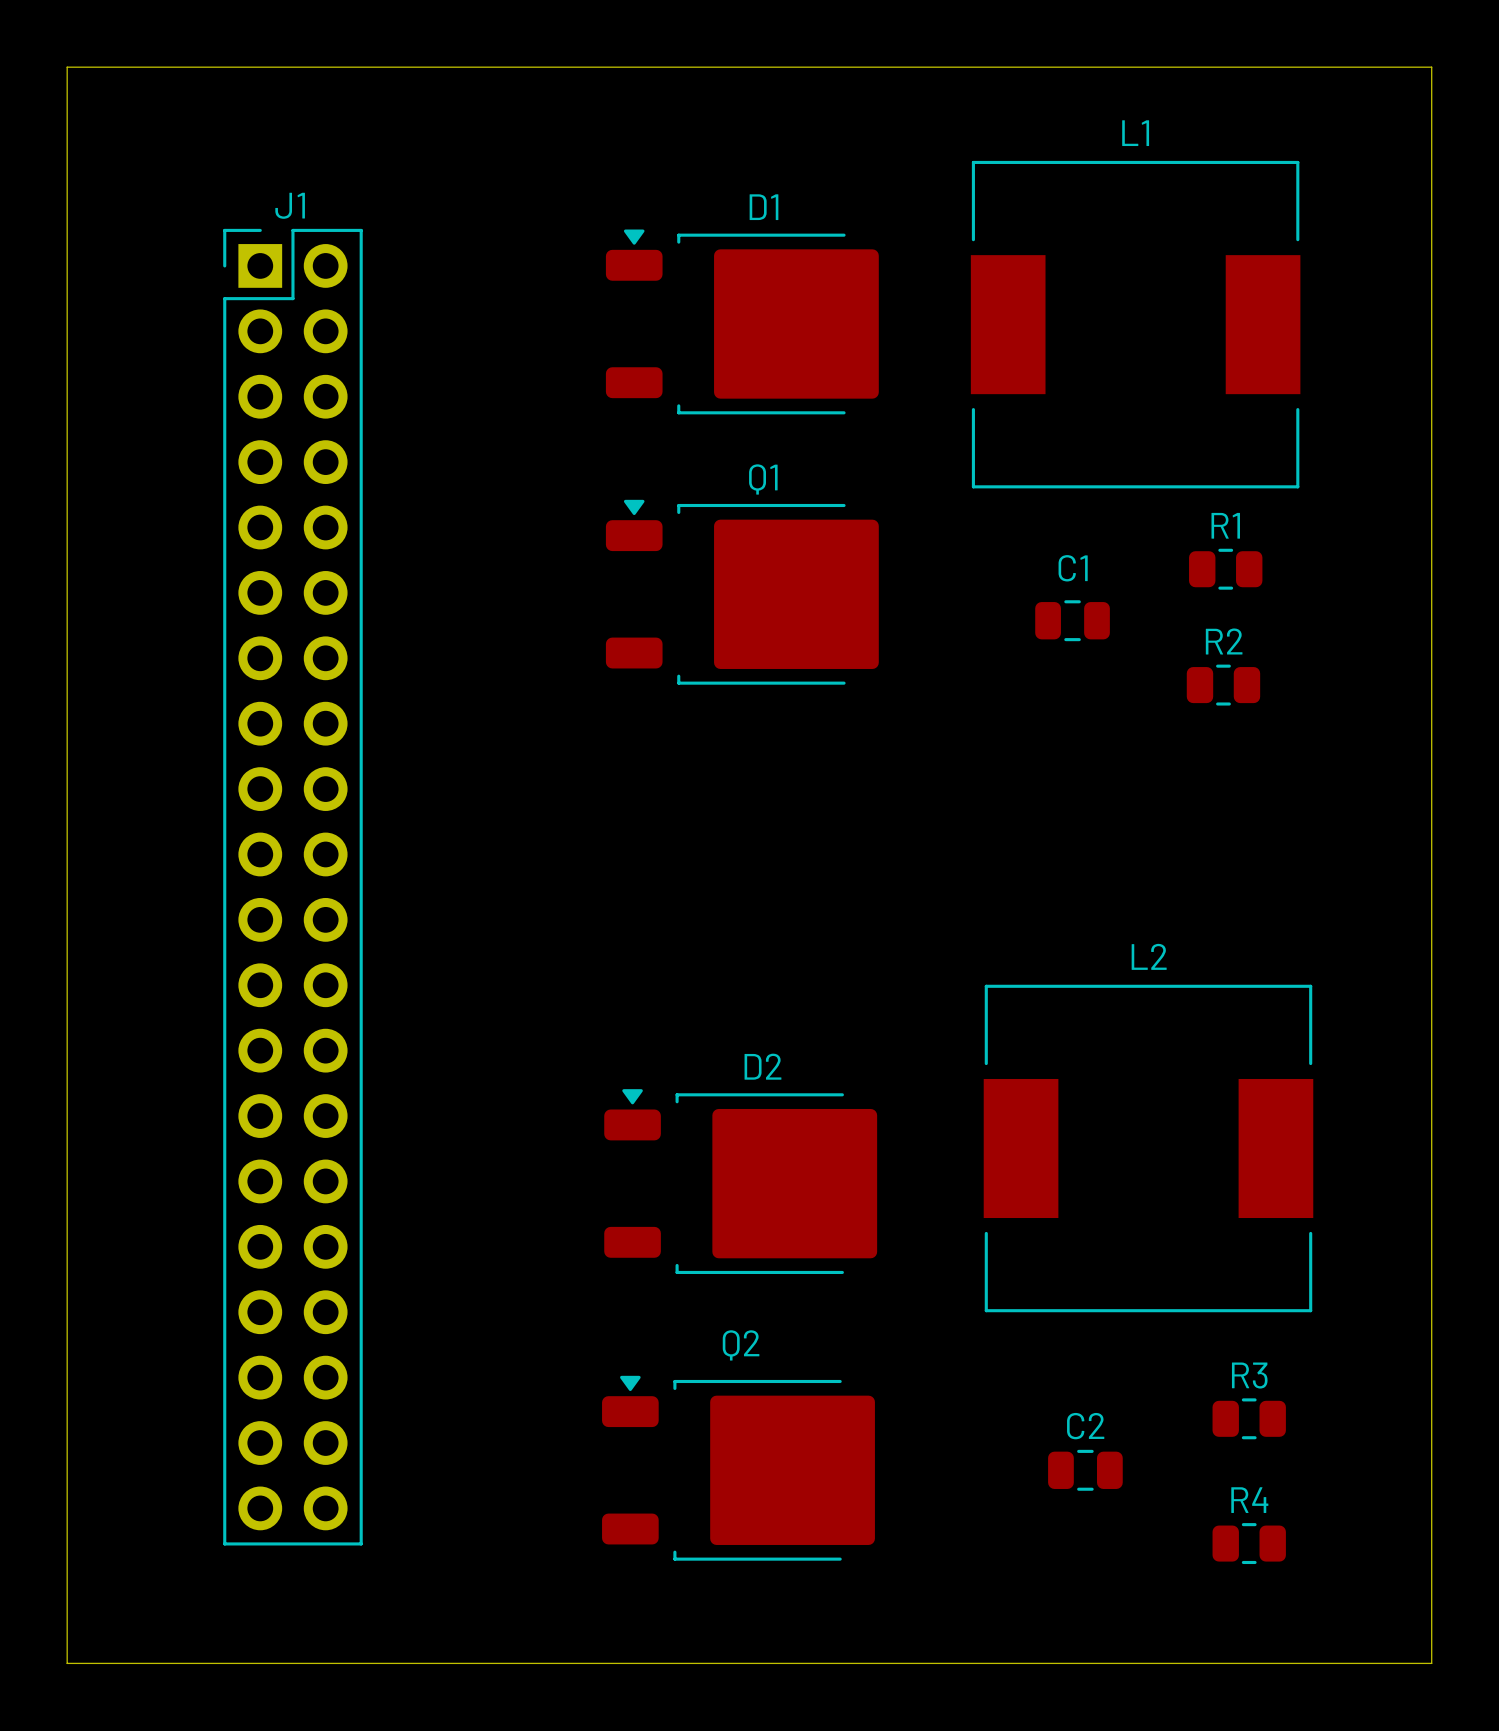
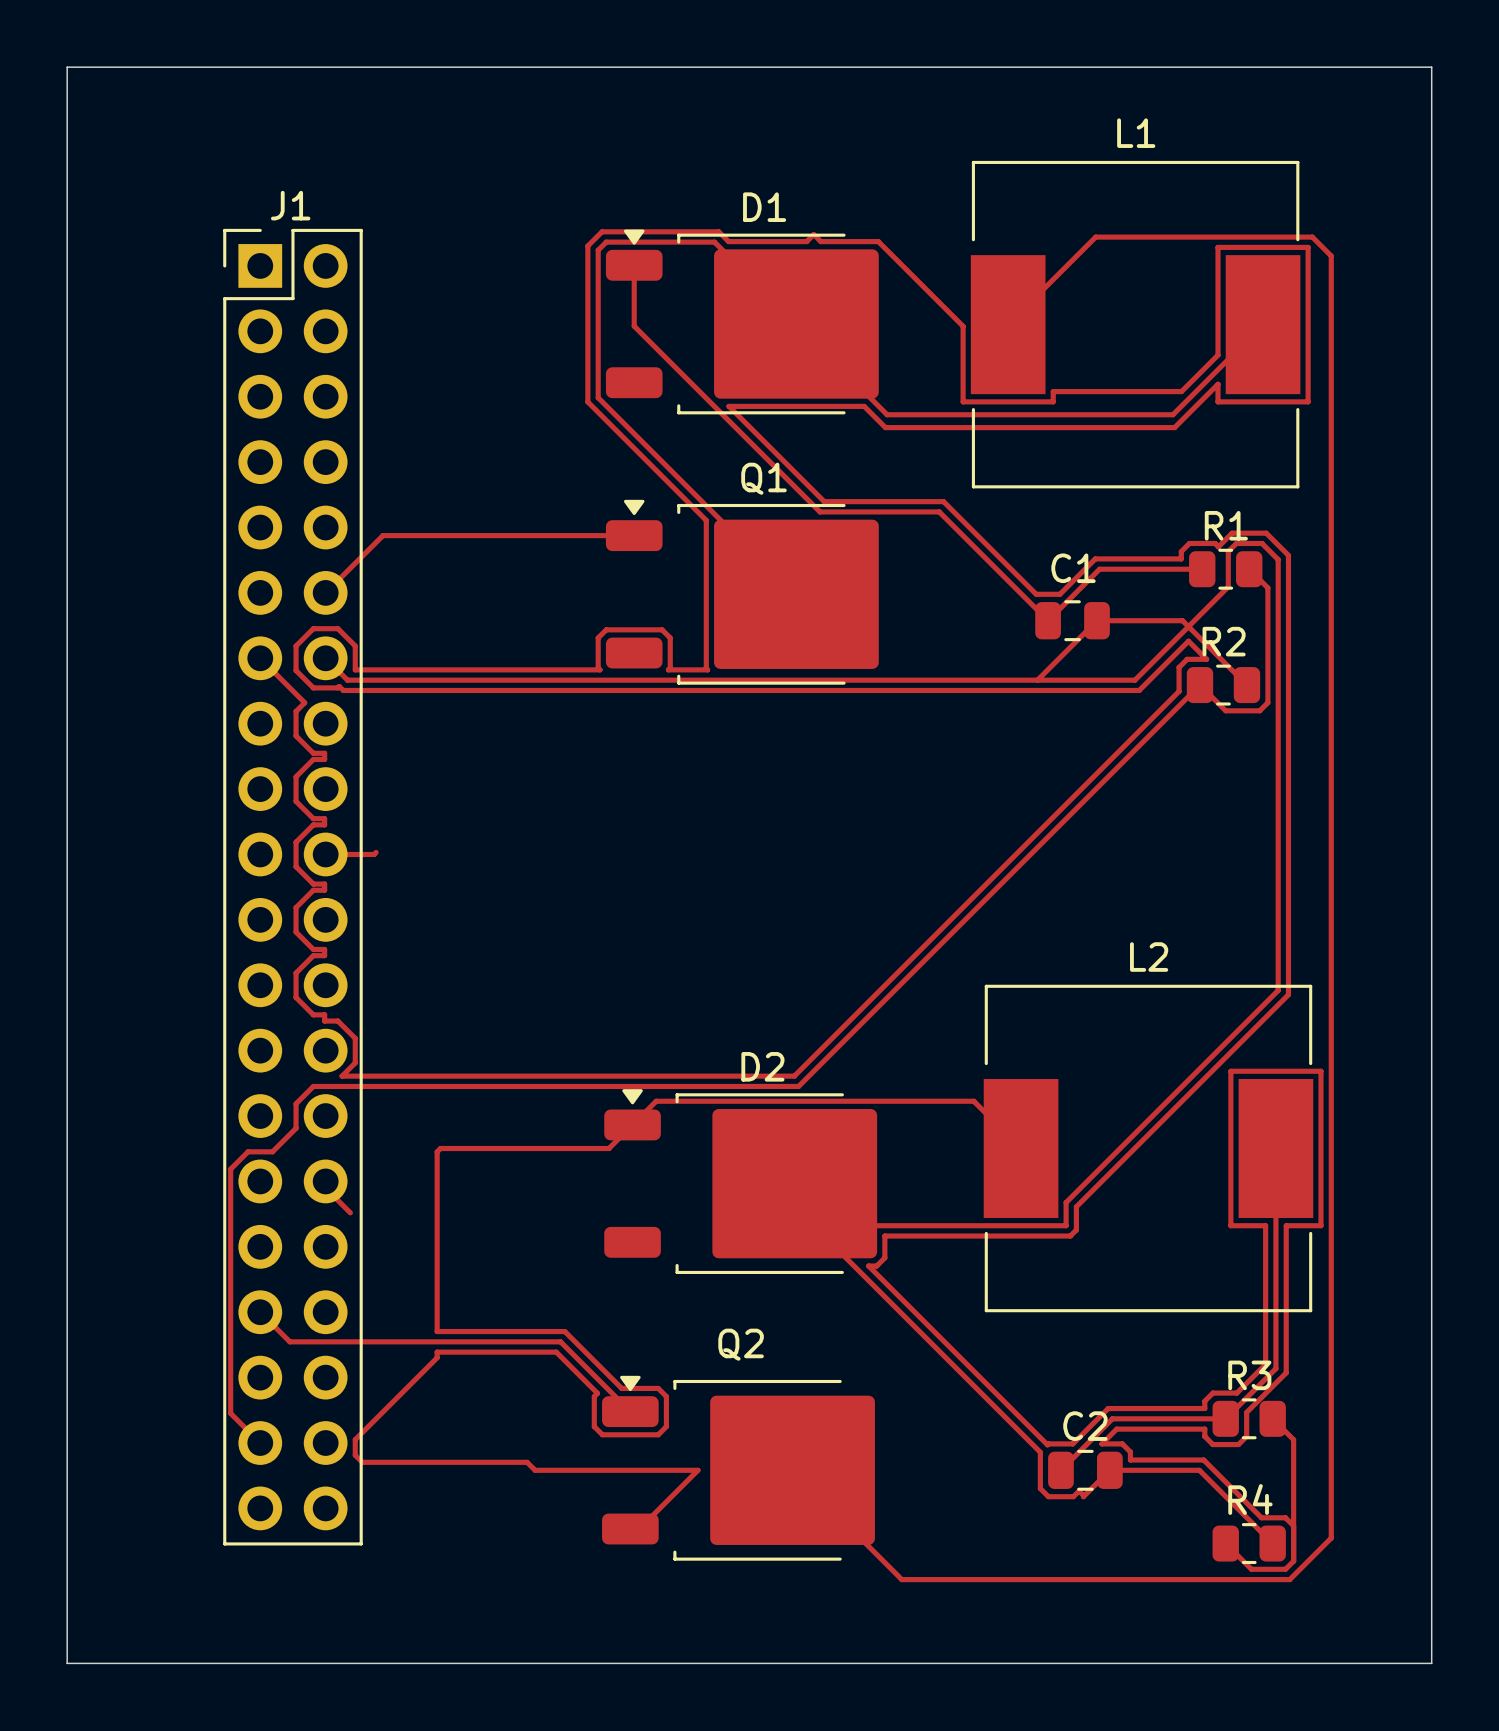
track: none -> (634, 265) (634, 326) (819, 511) (939, 511) (1048, 620) (1099, 569) (1202, 569)
track: none -> (1008, 324) (1095, 237) (1312, 237) (1331, 256) (1331, 1538) (1289, 1579) (901, 1579) (792, 1470)
track: none -> (1264, 324) (1172, 414) (887, 414) (714, 242) (606, 242) (598, 250) (598, 397) (796, 594)
track: none -> (634, 535) (382, 535) (325, 592)
track: none -> (1249, 569) (1267, 587) (1267, 702) (1259, 710) (1225, 710) (1199, 685) (798, 1086) (313, 1086) (296, 1103) (296, 1128) (272, 1151) (248, 1151) (230, 1169) (230, 1413) (260, 1443)
track: none -> (260, 658) (304, 702) (296, 711) (296, 735) (313, 753) (324, 753) (324, 759) (313, 759) (296, 776) (296, 801) (313, 818) (324, 818) (324, 824) (313, 824) (296, 842) (296, 866) (313, 884) (324, 884) (324, 890) (313, 890) (296, 907) (296, 932) (313, 949) (324, 949) (324, 955) (313, 955) (296, 973) (296, 997) (313, 1014) (324, 1014) (324, 1021) (337, 1021) (355, 1038) (355, 1062) (342, 1076) (794, 1076) (1179, 691) (1179, 667) (1187, 659) (1206, 659) (1188, 641) (1139, 690) (343, 690) (339, 686) (313, 687) (296, 670) (296, 646) (313, 628) (337, 628) (355, 646) (355, 669) (599, 669) (598, 668) (598, 637) (606, 629) (662, 629) (670, 637) (670, 668) (668, 669) (707, 669) (706, 520) (587, 402) (587, 245) (602, 231) (718, 231) (728, 241) (806, 241) (813, 234) (820, 241) (878, 241) (963, 326) (963, 401) (1053, 401) (1053, 391) (1181, 391) (1218, 355) (1218, 247) (1308, 247) (1308, 401) (1218, 401) (1218, 384) (1174, 427) (885, 427) (864, 406) (728, 406) (824, 501) (943, 501) (1036, 594) (1059, 594) (1095, 558) (1181, 558) (1181, 551) (1189, 543) (1215, 543) (1218, 546) (1232, 533) (1266, 533) (1288, 555) (1288, 994) (1076, 1206) (1076, 1229) (1070, 1236) (884, 1236) (884, 1257) (876, 1266) (868, 1266) (1047, 1444) (1072, 1443) (1108, 1408) (1204, 1408) (1204, 1401) (1212, 1393) (1236, 1393) (1265, 1364) (1265, 1225) (1230, 1225) (1230, 1071) (1320, 1071) (1320, 1225) (1286, 1225) (1286, 1372) (1246, 1412) (1246, 1436) (1238, 1444) (1212, 1444) (1204, 1436) (1204, 1429) (1116, 1429) (1101, 1443) (1122, 1443) (1130, 1452) (1130, 1460) (1203, 1460) (1261, 1517) (1285, 1517) (1293, 1525)
track: none -> (325, 658) (347, 680) (1134, 680) (1228, 586) (1228, 551) (1236, 543) (1262, 543) (1278, 559) (1278, 990) (1066, 1202) (1066, 1225) (836, 1225) (794, 1183) (794, 1206) (1040, 1452) (1040, 1488) (1048, 1496) (1073, 1496) (1079, 1491) (1083, 1496) (1109, 1470) (1199, 1470) (1272, 1543)
track: none -> (1037, 680) (1097, 620) (1182, 620) (1246, 685)
track: none -> (327, 852) (325, 854) (374, 854) (376, 852)
track: none -> (1019, 1148) (973, 1101) (656, 1101) (608, 1148) (440, 1148) (437, 1151) (437, 1331) (564, 1331) (621, 1388) (658, 1388) (666, 1396) (666, 1426) (658, 1434) (602, 1434) (594, 1426) (594, 1396) (597, 1393) (556, 1352) (437, 1352) (437, 1357) (355, 1439) (355, 1455) (362, 1462) (527, 1462) (535, 1470) (697, 1470) (639, 1529) (630, 1529)
track: none -> (1275, 1148) (1275, 1368) (1225, 1418) (1112, 1418) (1060, 1470)
track: none -> (325, 1181) (327, 1183) (327, 1190) (350, 1212)
track: none -> (260, 1312) (289, 1341) (560, 1341) (630, 1411)
track: none -> (1272, 1418) (1293, 1439) (1293, 1561) (1285, 1569) (1251, 1569) (1225, 1543)

